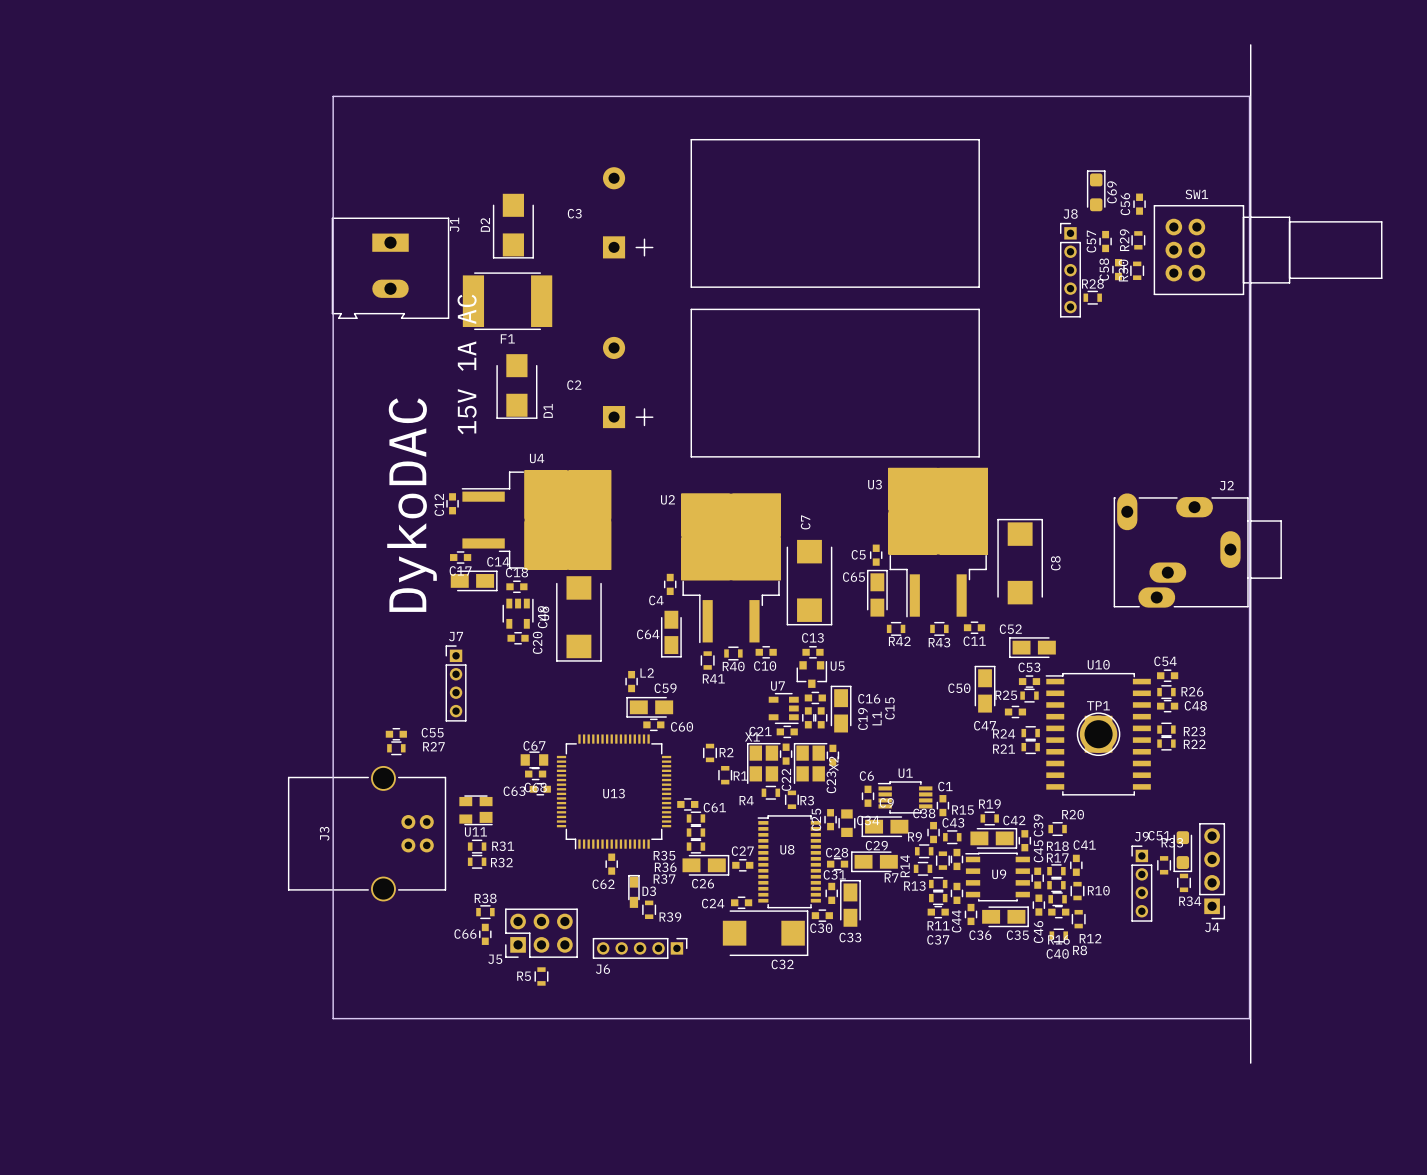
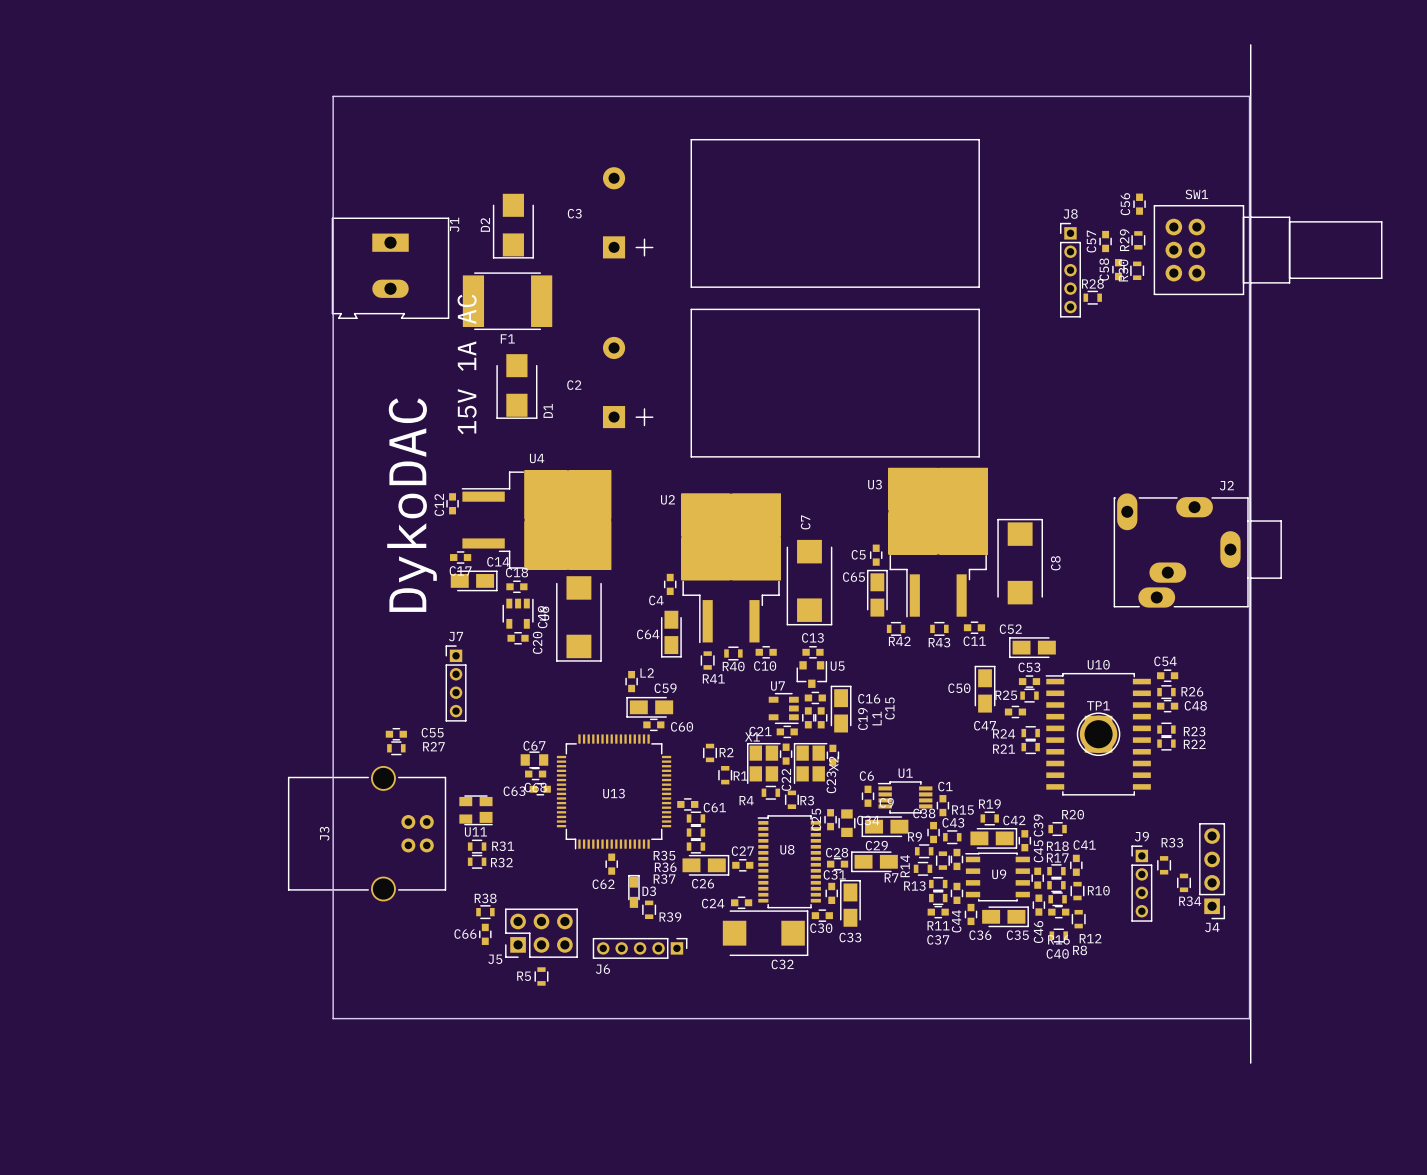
C69: (1096, 190) -> none
C51: (1182, 851) -> none

